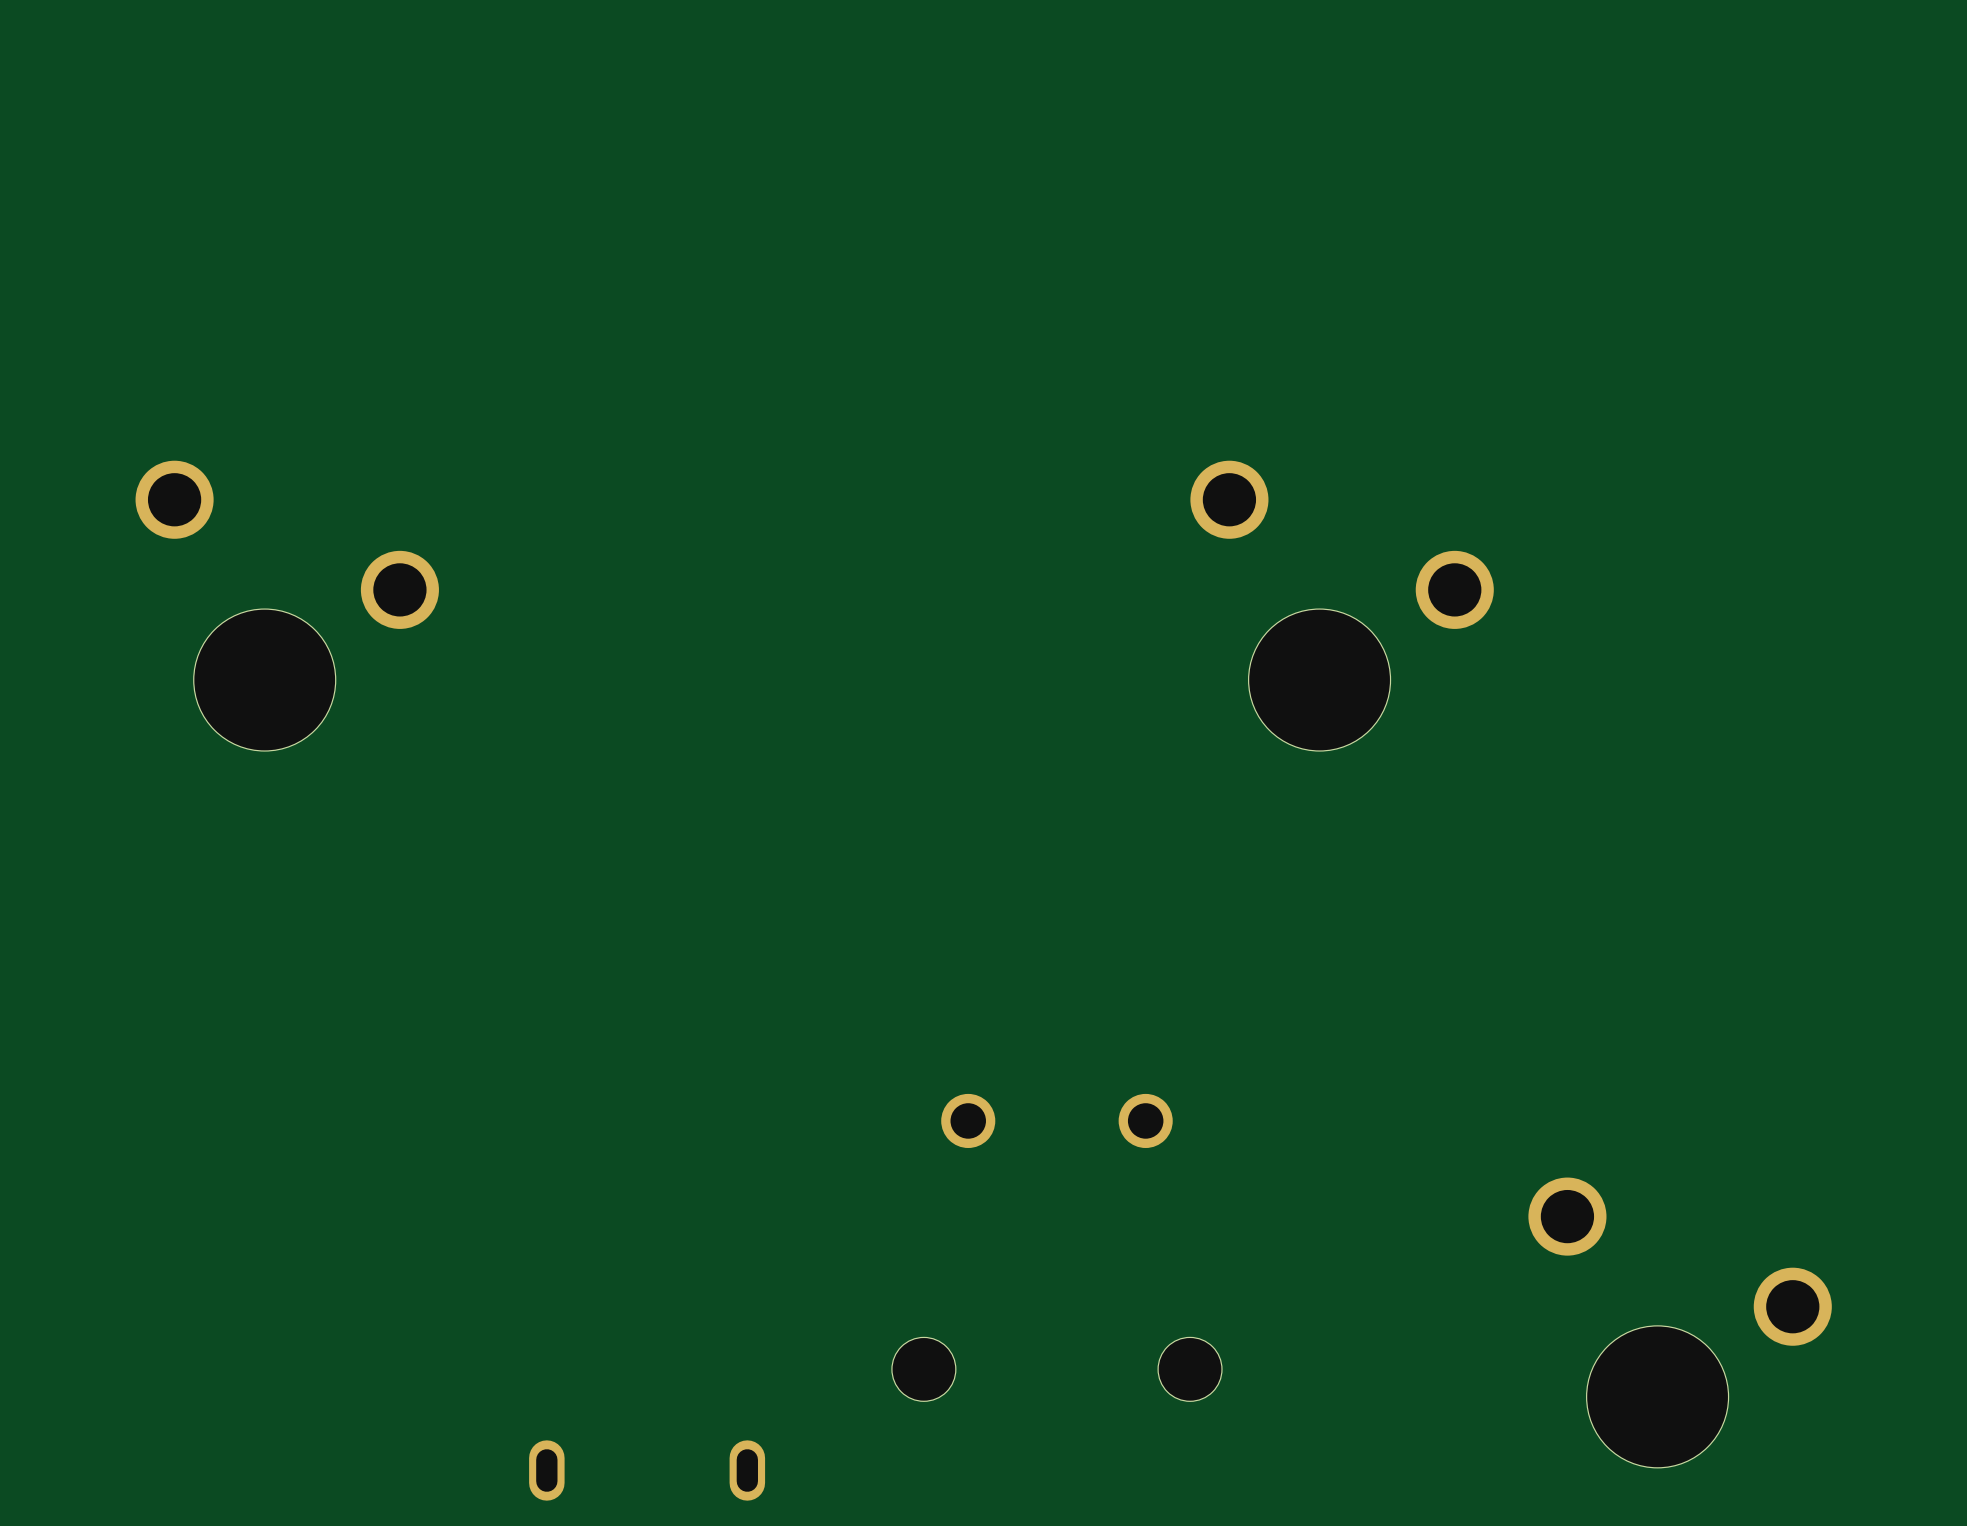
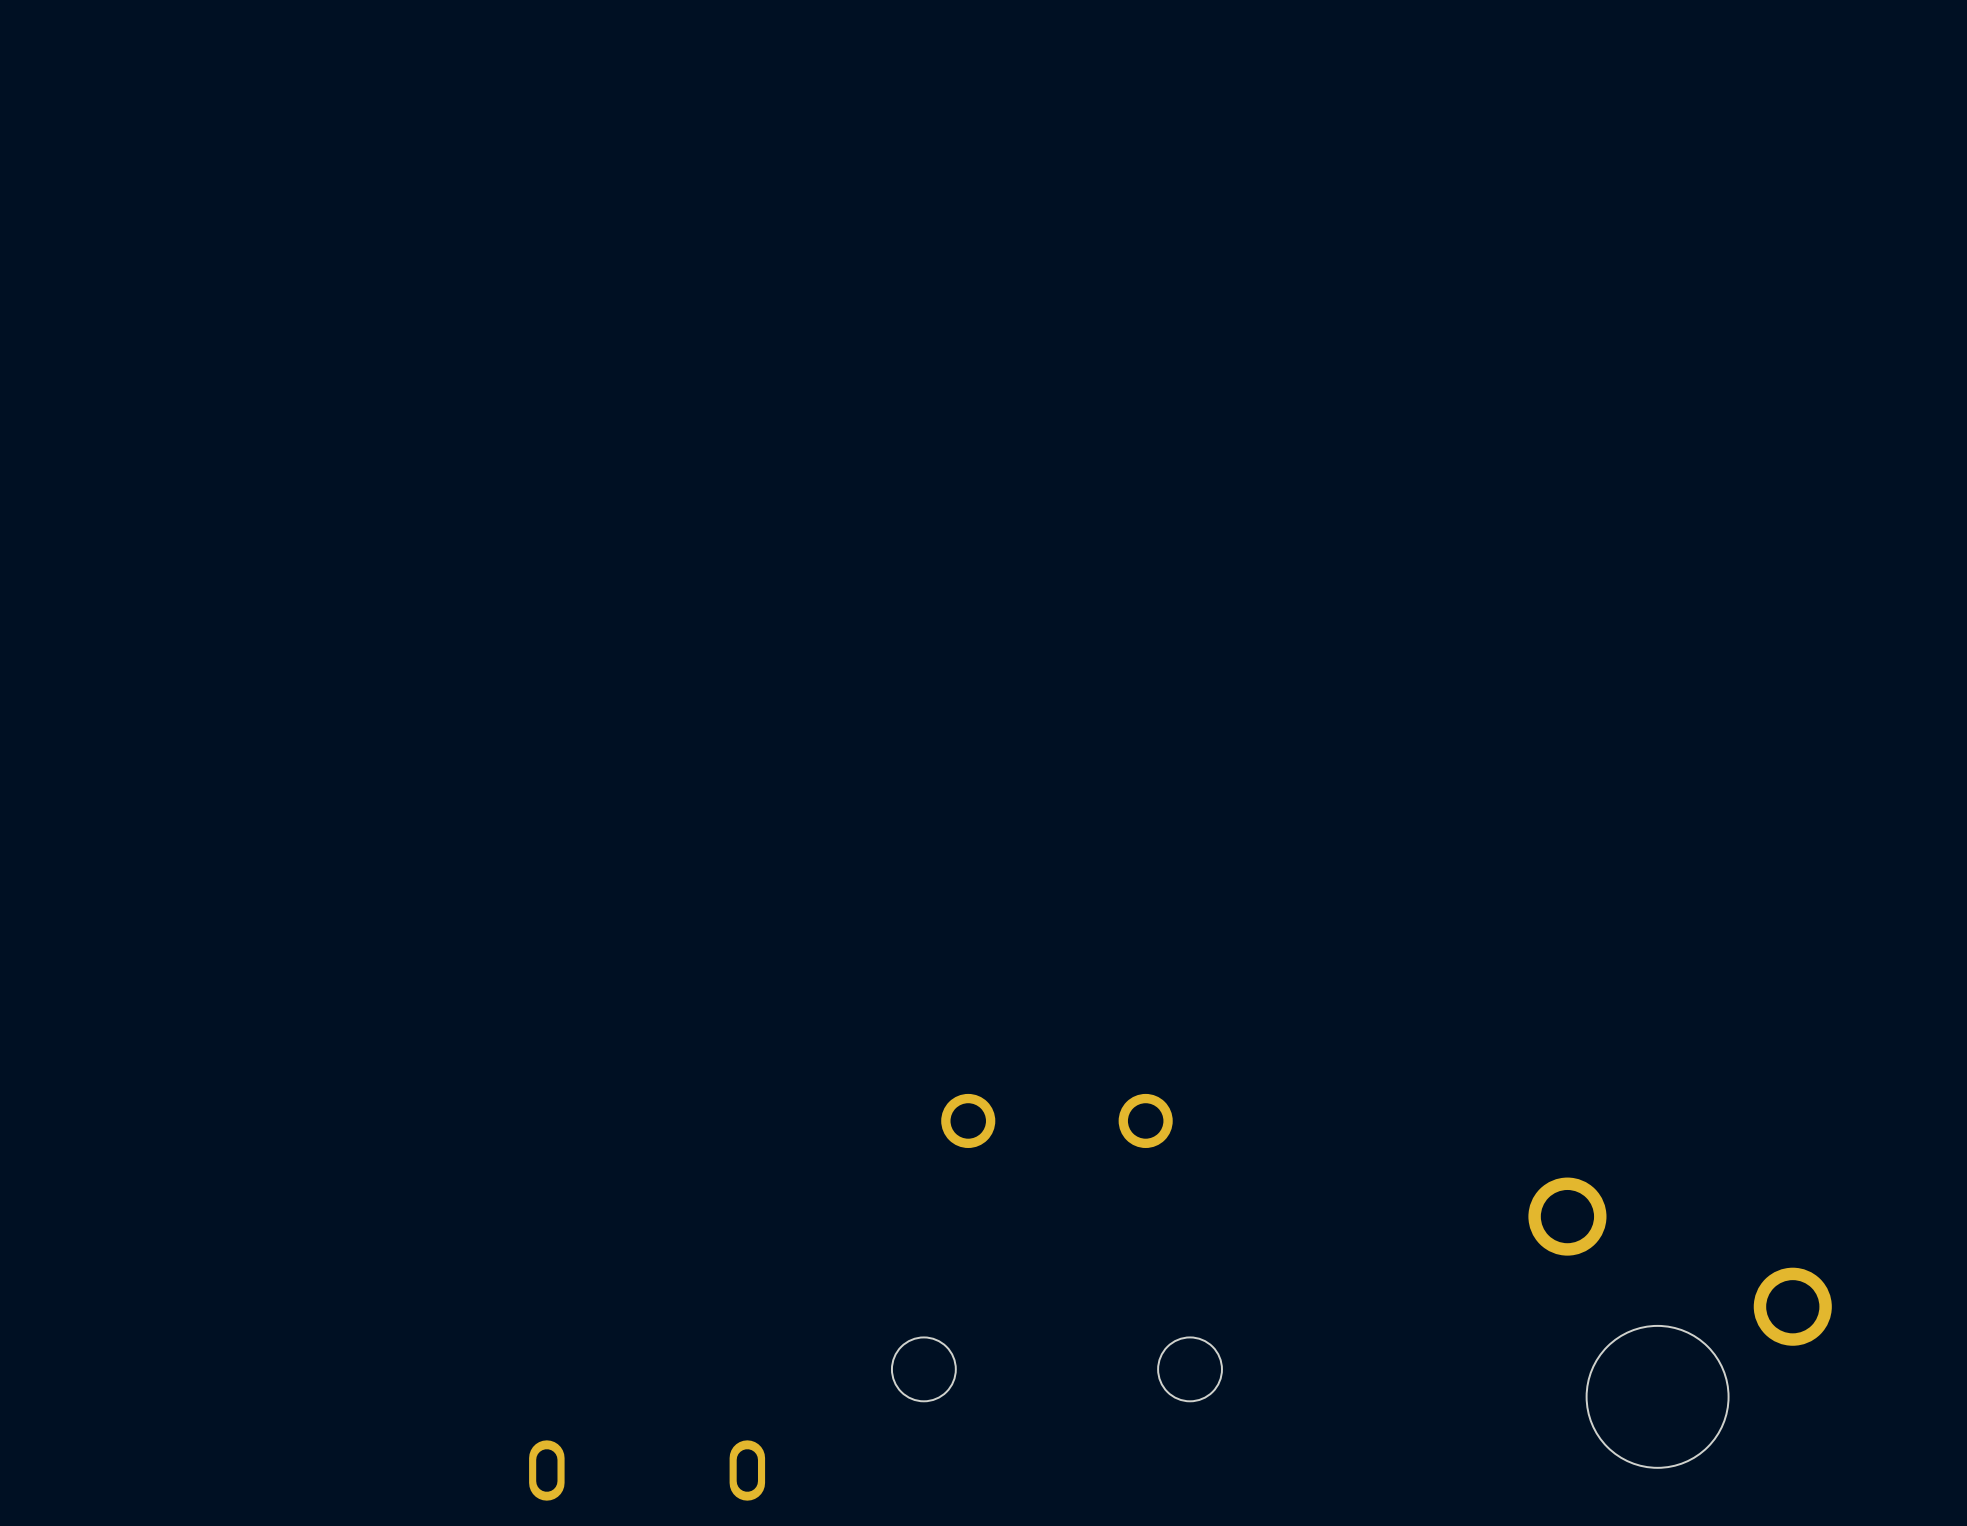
part: (287, 605) -> none
part: (1342, 605) -> none

